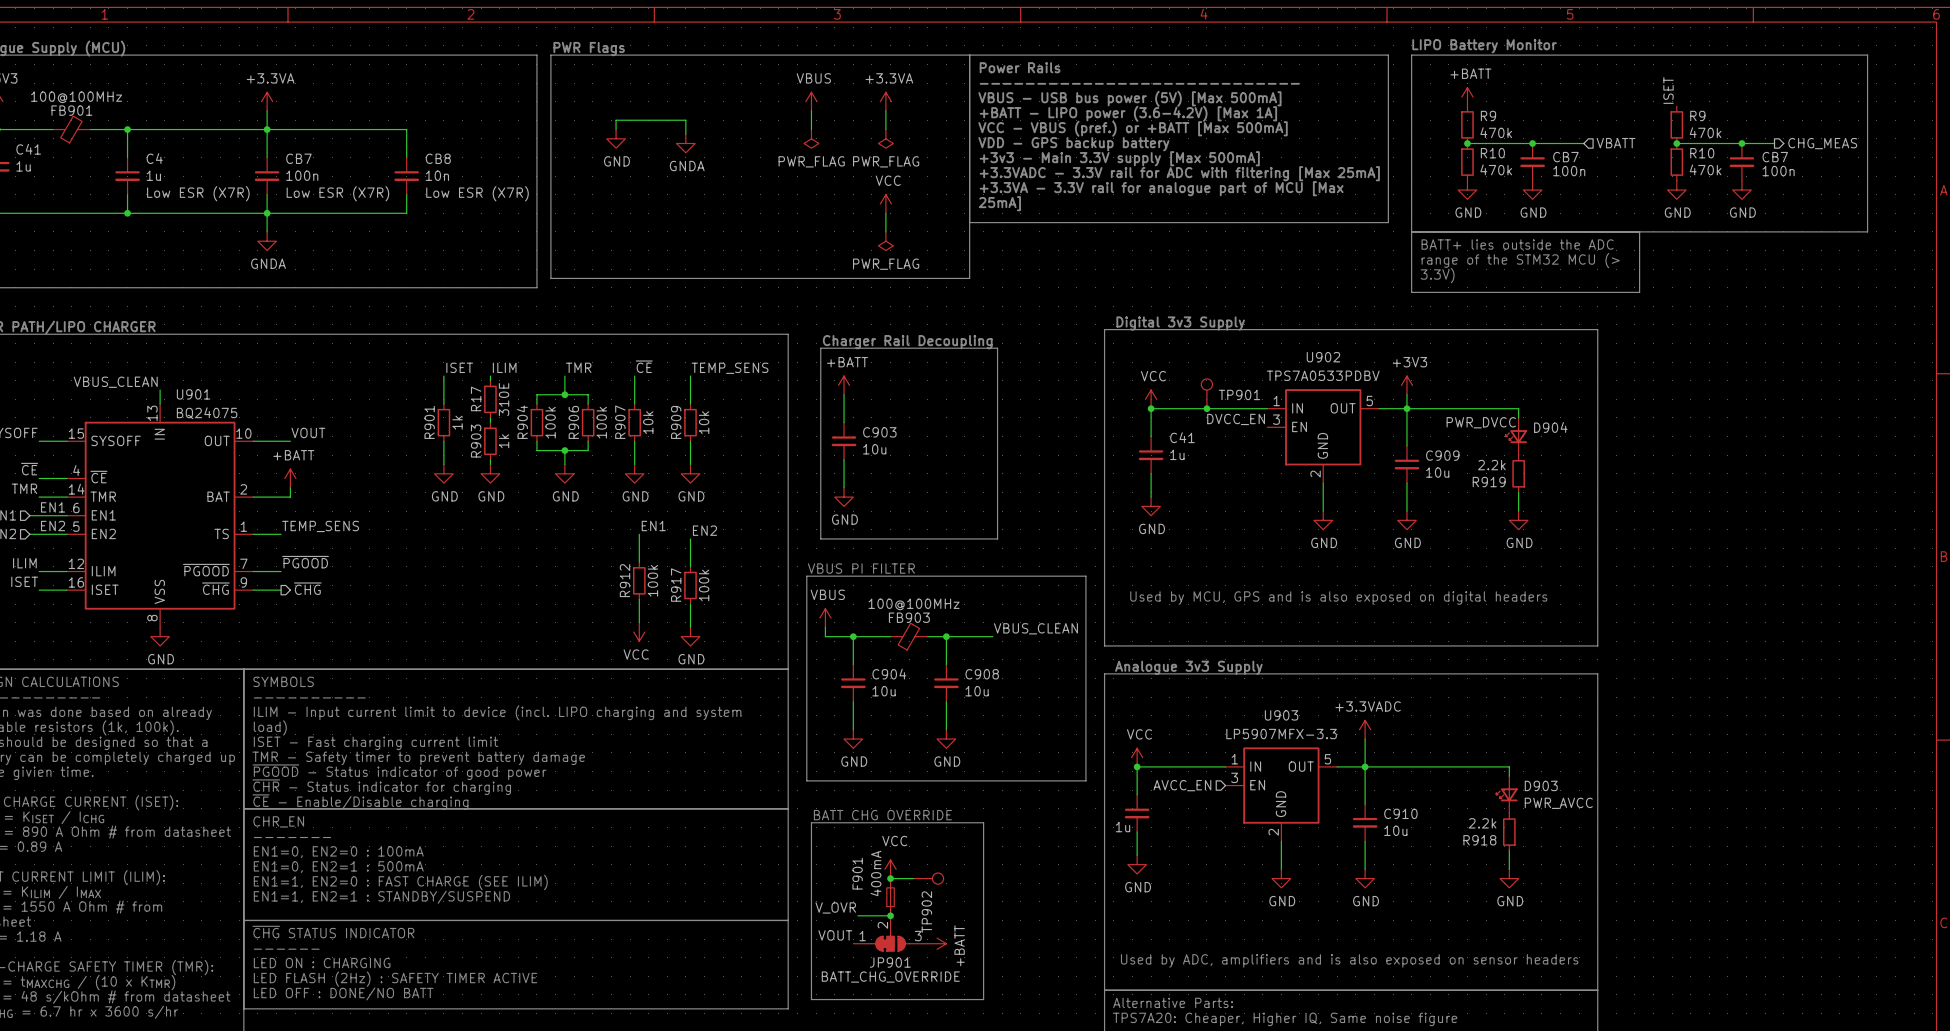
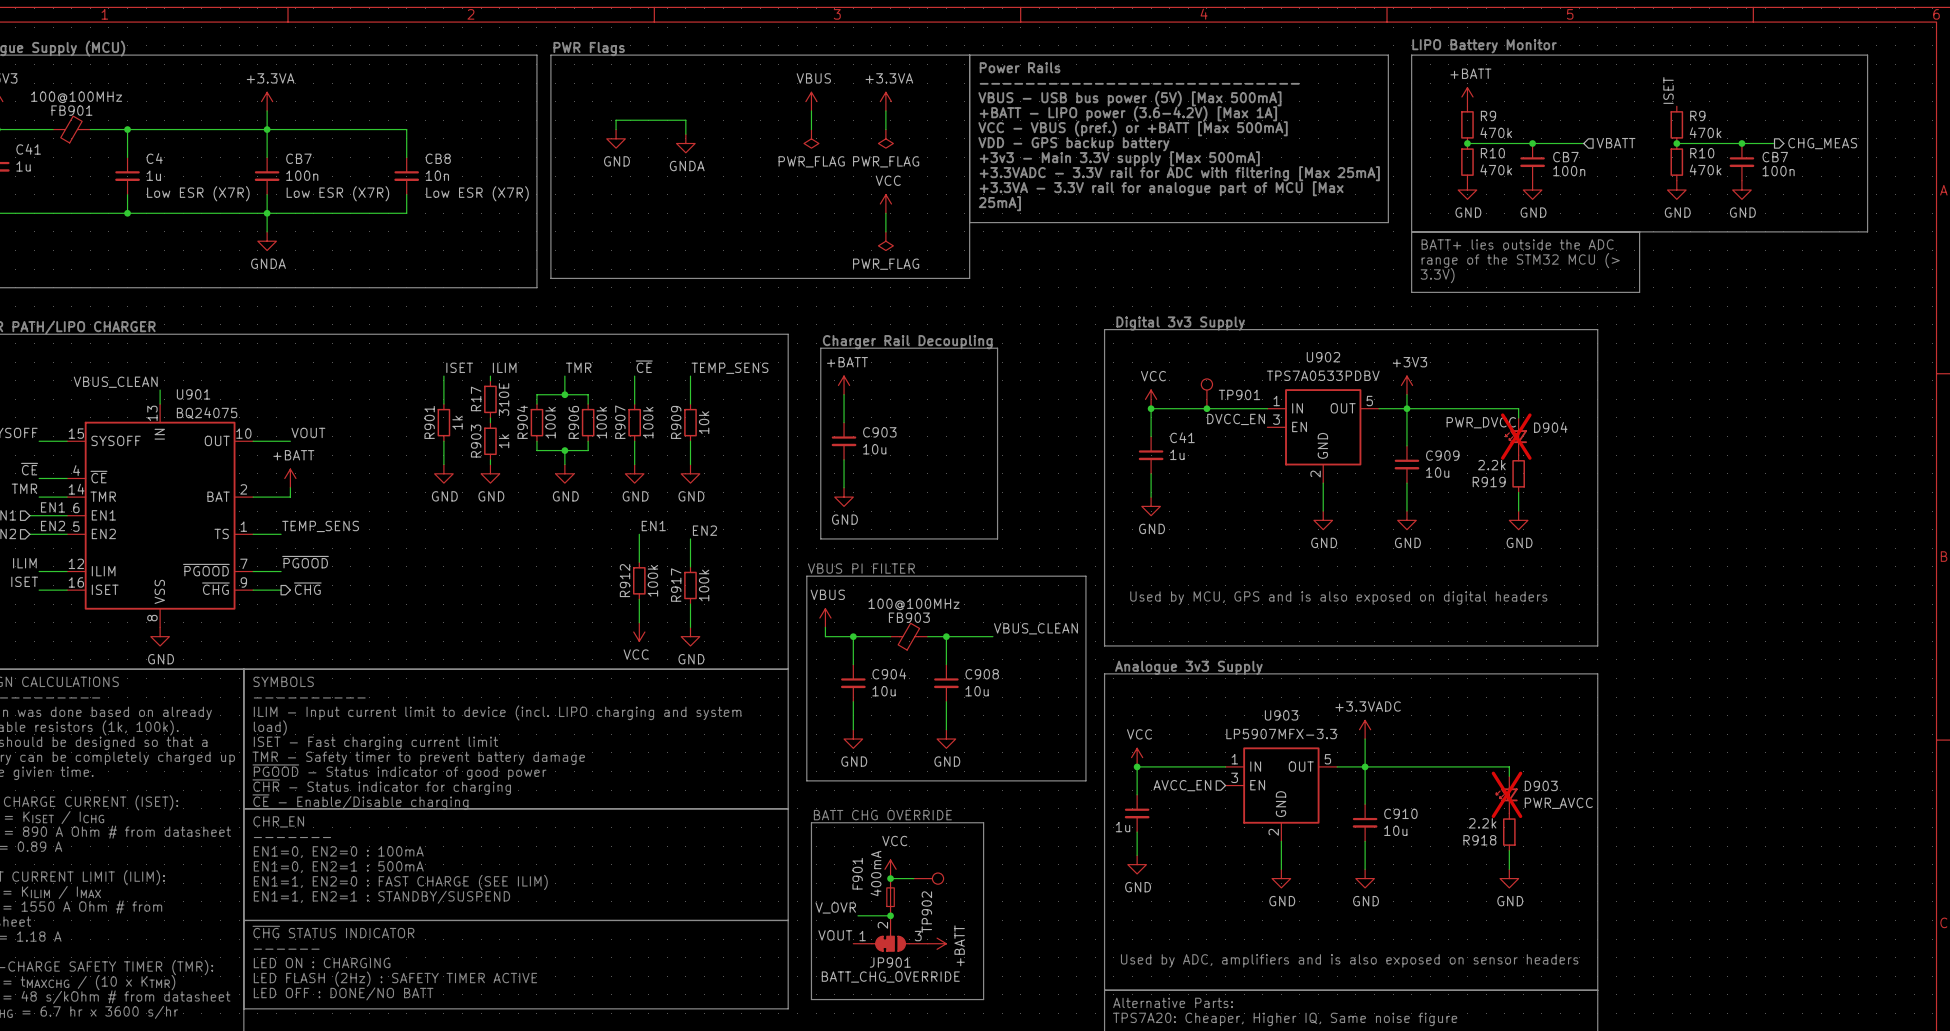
R907 value: 10k (648, 422) -> 100k (648, 422)
D904 do-not-place cross: none -> (1516, 436)
D903 do-not-place cross: none -> (1507, 794)

